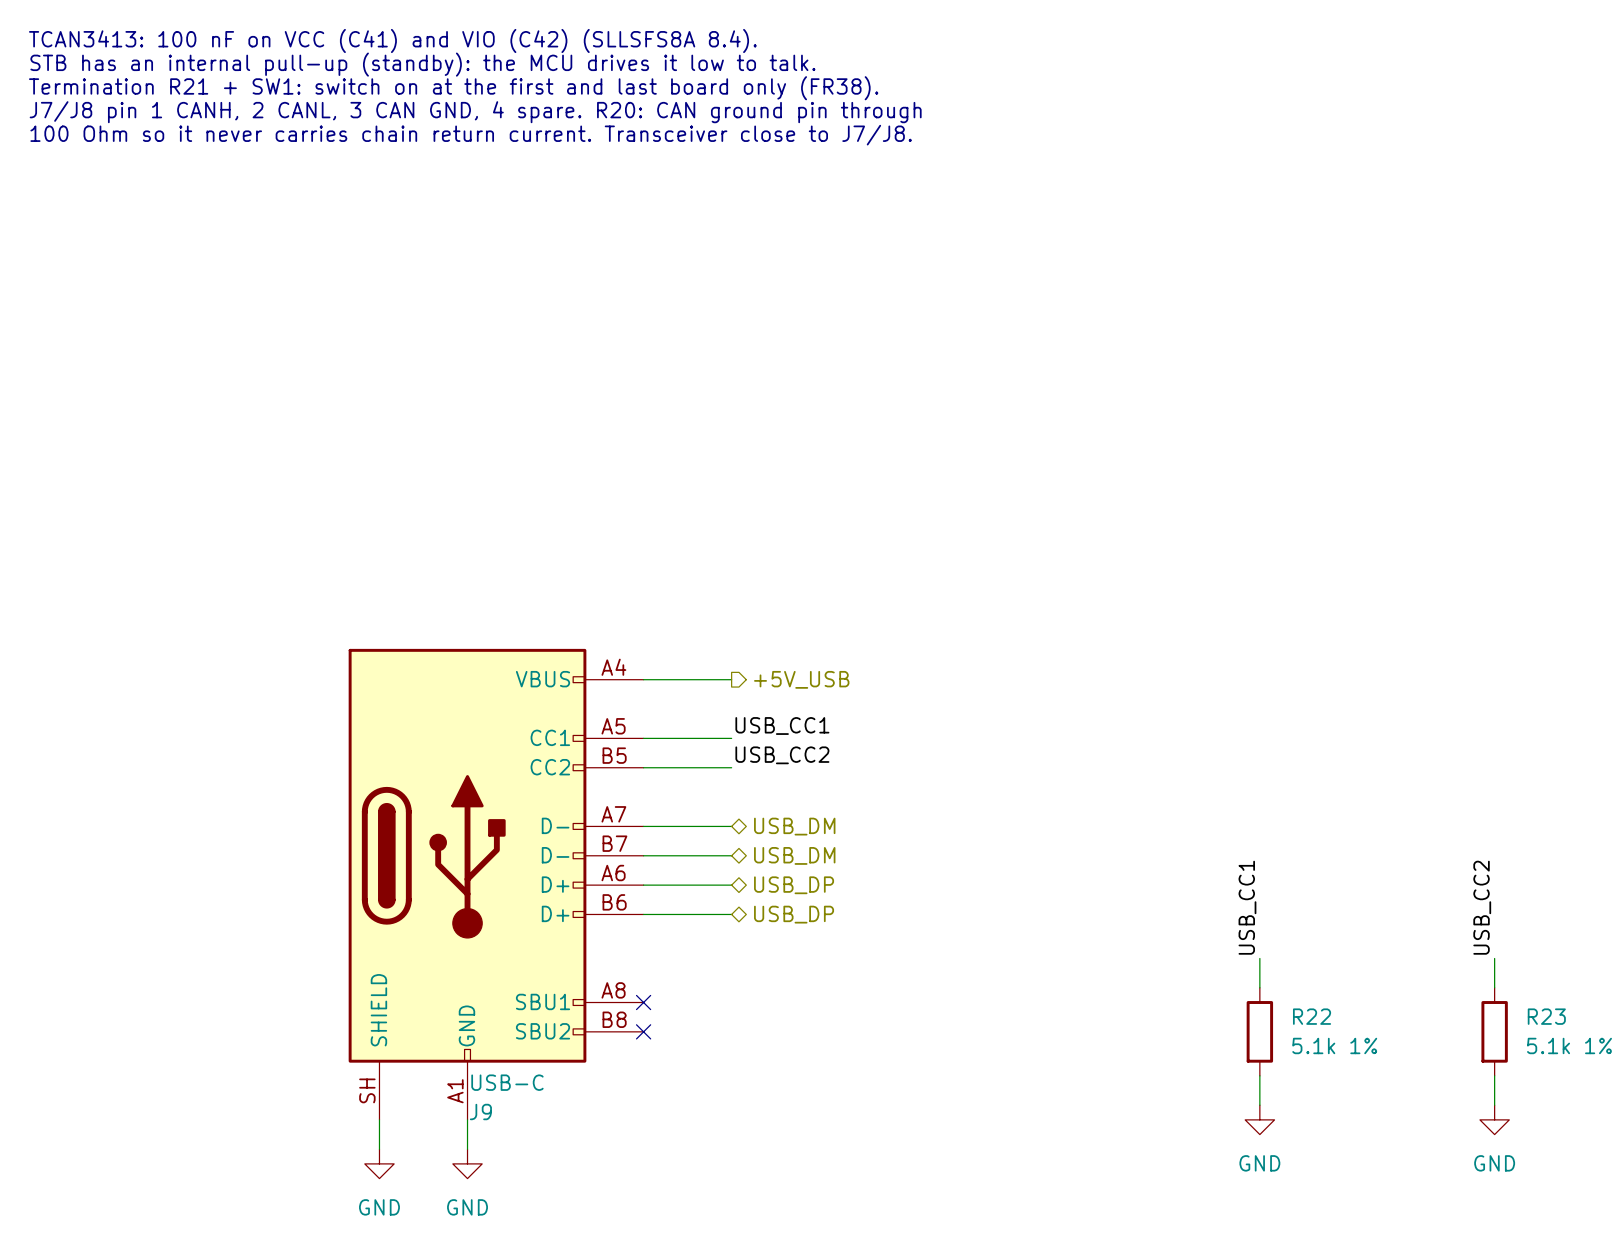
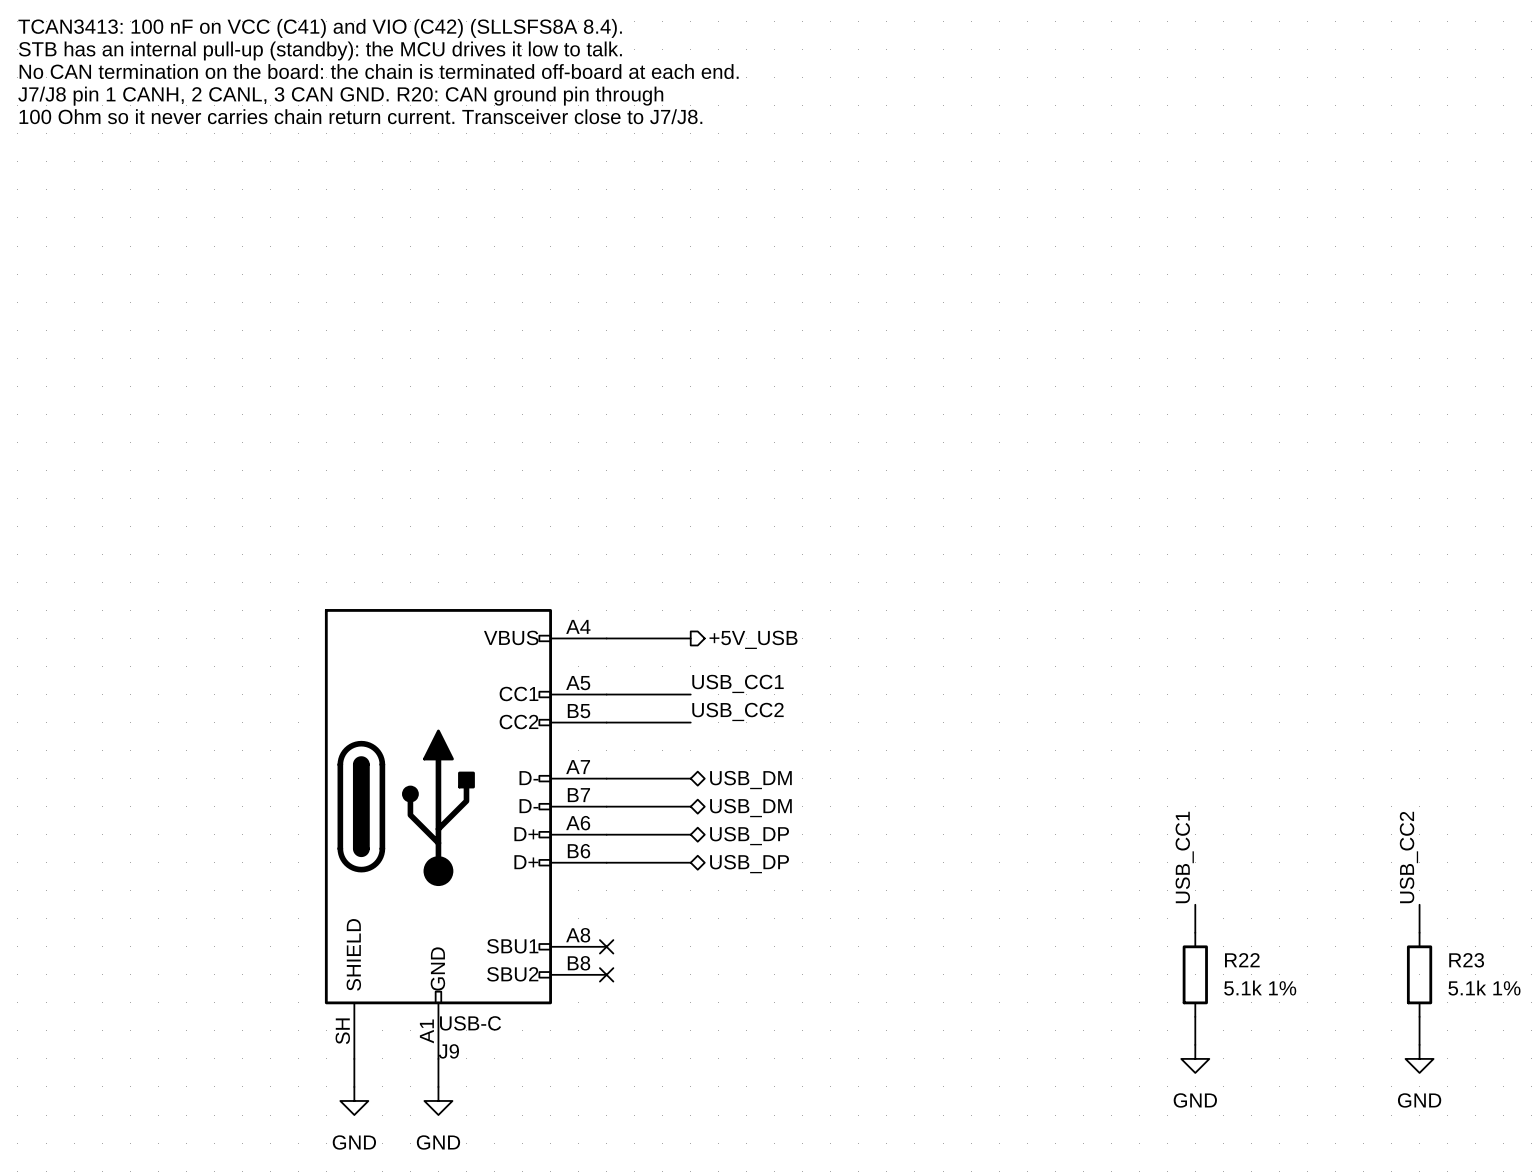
text: Termination R21 + SW1: switch on at the first and last board only (FR38). (453, 88) -> No CAN termination on the board: the chain is terminated off-board at each end. (379, 71)
text: J7/J8 pin 1 CANH, 2 CANL, 3 CAN GND, 4 spare. R20: CAN ground pin through (475, 112) -> J7/J8 pin 1 CANH, 2 CANL, 3 CAN GND. R20: CAN ground pin through (340, 96)

